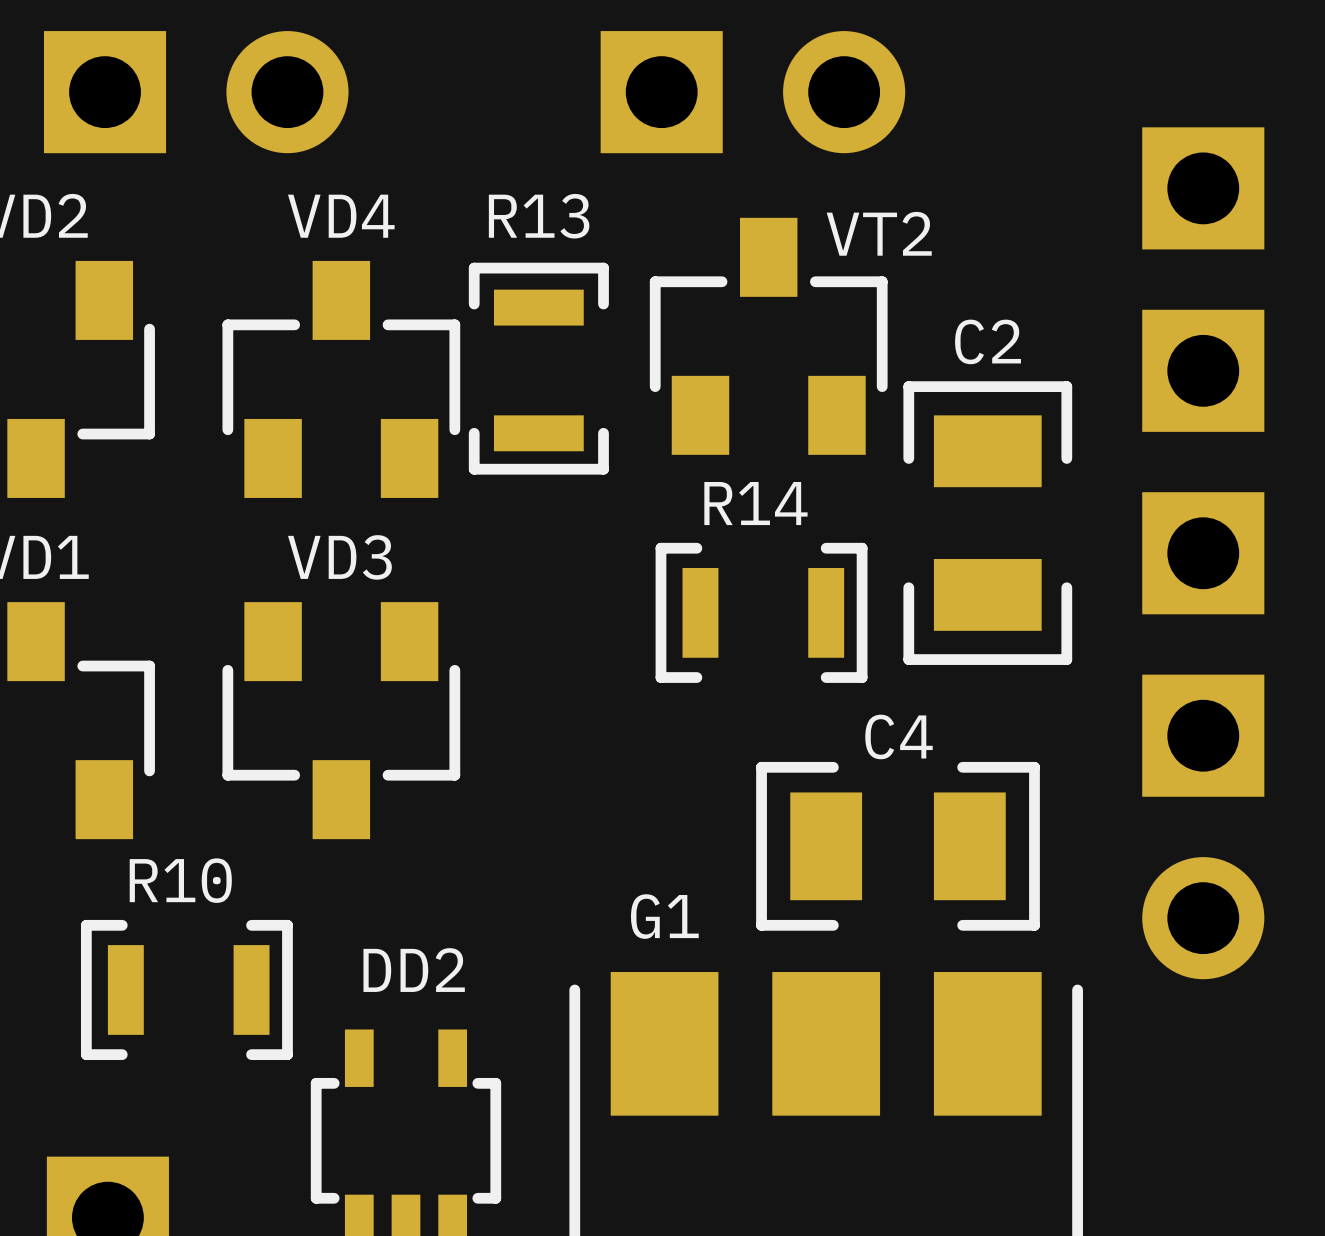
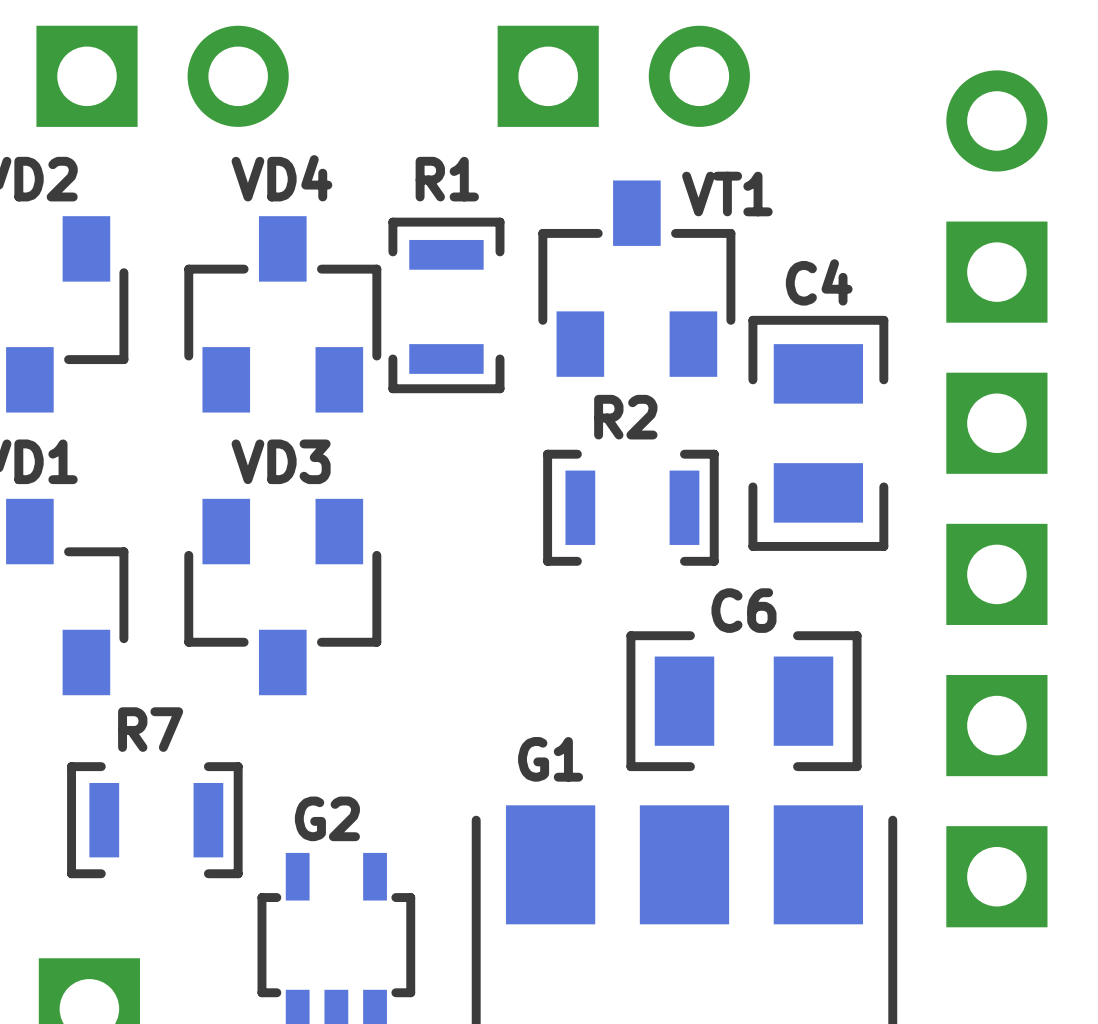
part footprint: [1142, 127, 1265, 980] -> [946, 70, 1048, 928]
R13 name: R13 (539, 216) -> R1 (447, 179)
VT2 name: VT2 (879, 233) -> VT1 (727, 194)
C2 name: C2 (988, 341) -> C4 (819, 282)
R14 name: R14 (755, 503) -> R2 (625, 417)
C4 name: C4 (899, 736) -> C6 (743, 610)
R10 name: R10 (180, 880) -> R7 (150, 729)
DD2 name: DD2 (414, 970) -> G2 (327, 818)

